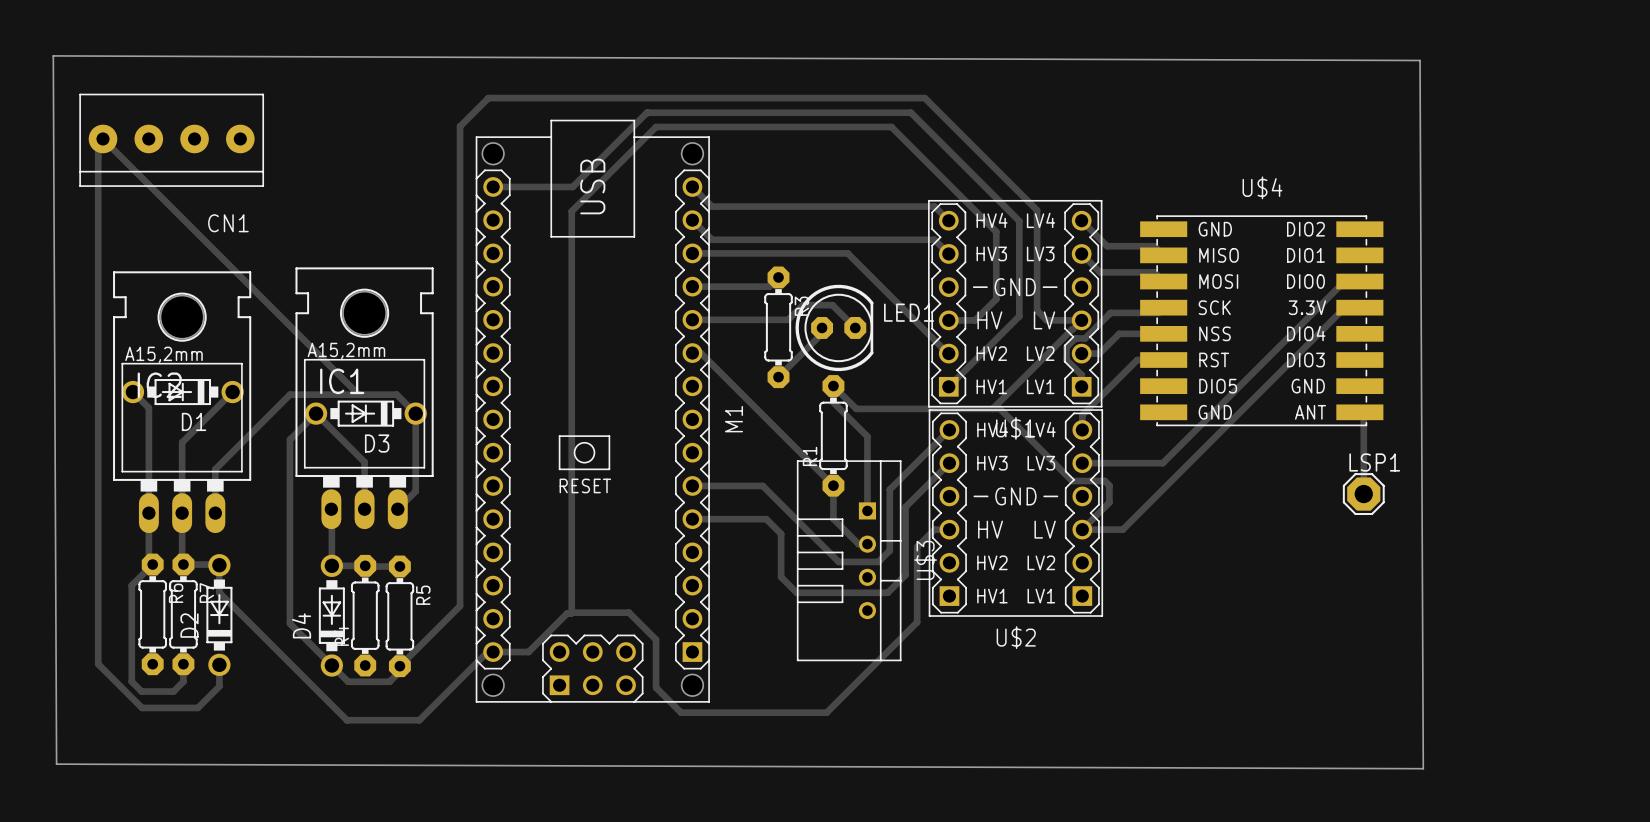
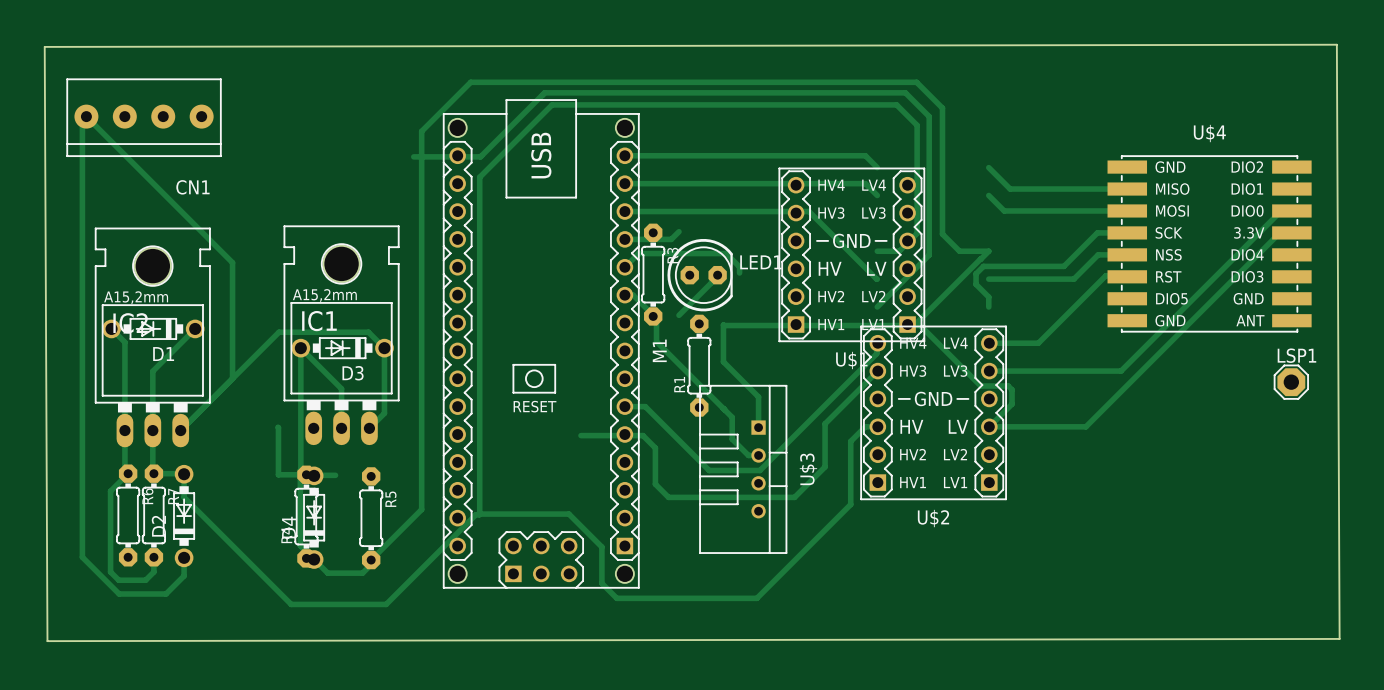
board edge: (53, 55) (1420, 60) (1423, 768) (56, 764) -> (44, 46) (1336, 44) (1339, 638) (47, 641)
track: (561, 98) (488, 98) (460, 126) (460, 606) (399, 666) (399, 671) (389, 681) (348, 681) (289, 623) (289, 439) (316, 413) (364, 462) (364, 509) -> (470, 82) (421, 131) (421, 509) (371, 560) (371, 564) (362, 573) (327, 573) (300, 545) (300, 348) (341, 388) (341, 428)
track: (924, 98) (1037, 210) (1037, 310) (1046, 320) (1081, 320) (992, 408) -> (776, 82) (916, 82) (942, 108) (942, 234) (959, 251) (988, 251) (914, 325)
track: (646, 112) (910, 112) (1019, 221) (1019, 316) (948, 386) -> (542, 94) (544, 92) (905, 92) (929, 116) (929, 255) (877, 306)
track: (656, 127) (891, 127) (996, 231) (996, 299) (975, 320) (948, 320) -> (550, 106) (552, 104) (896, 104) (917, 125) (917, 233) (899, 251) (877, 251)
track: none -> (624, 155) (865, 155) (877, 167)
track: (692, 186) (712, 206) (934, 206) (948, 220) -> none
track: none -> (988, 167) (1010, 189) (1127, 189)
track: none -> (624, 183) (865, 183) (877, 195)
track: (692, 220) (712, 239) (934, 239) (948, 253) -> none
track: (1081, 220) (1107, 246) (1154, 246) (1163, 255) -> none
track: none -> (988, 195) (1004, 210) (1127, 210)
track: none -> (1291, 210) (1281, 210) (1121, 371) (989, 371)
track: none -> (624, 211) (809, 211) (877, 279)
track: (692, 253) (847, 253) (948, 353) -> none
track: (1081, 253) (1100, 272) (1154, 272) (1163, 281) -> none
track: none -> (679, 231) (671, 239) (624, 239)
track: (778, 277) (769, 286) (692, 286) -> none
track: none -> (1127, 232) (1097, 232) (1063, 266) (983, 266) (976, 273) (976, 284) (988, 297) (988, 306)
track: (1359, 281) (1344, 281) (1162, 463) (1082, 463) -> none
track: none -> (1127, 254) (1098, 254) (1073, 279) (988, 279)
track: (1163, 307) (1158, 312) (1110, 312) (1085, 338) (1075, 338) (1066, 347) (1066, 359) (1081, 375) (1081, 386) -> none
track: (1359, 307) (1344, 307) (1122, 529) (1082, 529) (1109, 502) (1109, 485) (1104, 480) (1072, 480) (1000, 408) (856, 408) (833, 386) (833, 402) (862, 431) -> (1291, 232) (1280, 231) (1085, 426) (989, 426) (1012, 404) (1012, 389) (1008, 386) (980, 386) (920, 325) (723, 324) (723, 361)
track: (277, 313) (358, 394) -> (232, 262) (232, 378)
track: none -> (624, 267) (638, 253) (726, 253) (739, 266) (739, 272)
track: (692, 319) (788, 319) (802, 305) (832, 305) (855, 327) -> none
U$4 position: (1261, 320) -> (1209, 243)
track: none -> (711, 272) (711, 282) (679, 315)
track: (822, 327) (822, 333) (778, 377) -> none
track: none -> (1127, 276) (1134, 275) (1105, 275) (1038, 343) (989, 343)
track: (1163, 333) (1119, 333) (1099, 353) (1081, 353) -> none
track: none -> (624, 295) (633, 295) (656, 318) (656, 341) (732, 417) (732, 439) (748, 455) (758, 455)
track: (692, 353) (700, 353) (835, 487) -> none
track: (1163, 360) (1137, 360) (1082, 414) (1082, 429) -> none
IC1 position: (364, 398) -> (341, 335)
track: none -> (877, 343) (876, 353) (759, 470) (709, 470) (645, 406) (624, 406)
M1 position: (592, 411) -> (541, 343)
track: (1359, 412) (1363, 408) (1363, 494) -> none
D3 position: (365, 413) -> (342, 348)
track: (949, 429) (889, 489) (889, 550) (878, 561) (838, 561) (762, 485) (692, 485) -> none
track: (867, 436) (867, 510) -> (727, 366) (758, 396) (758, 427)
track: (949, 463) (905, 507) (905, 575) (887, 592) -> (877, 371) (825, 423) (825, 466) (794, 497) (744, 497)
track: (833, 485) (833, 518) (858, 544) (867, 544) -> none
LSP1 position: (1363, 494) -> (1291, 382)
track: (397, 509) (415, 491) (415, 413) (396, 394) (290, 394) (215, 469) (215, 513) -> (369, 428) (384, 413) (384, 348) (368, 332) (279, 332) (180, 430)
U$2 position: (1015, 513) -> (933, 412)
track: (949, 529) (934, 529) (917, 547) (917, 622) (826, 712) (681, 712) (656, 687) (656, 639) (629, 612) -> (877, 426) (865, 426) (850, 441) (850, 504) (756, 598) (616, 598) (601, 583) (601, 547) (568, 514) (527, 514)
U$3 position: (849, 560) -> (743, 469)
D4 position: (331, 615) -> (314, 517)
R5 position: (399, 616) -> (371, 518)
track: (494, 650) (493, 652) (528, 652) -> none
track: (493, 651) (487, 651) (419, 720) -> (443, 547) (386, 604) (351, 604)

